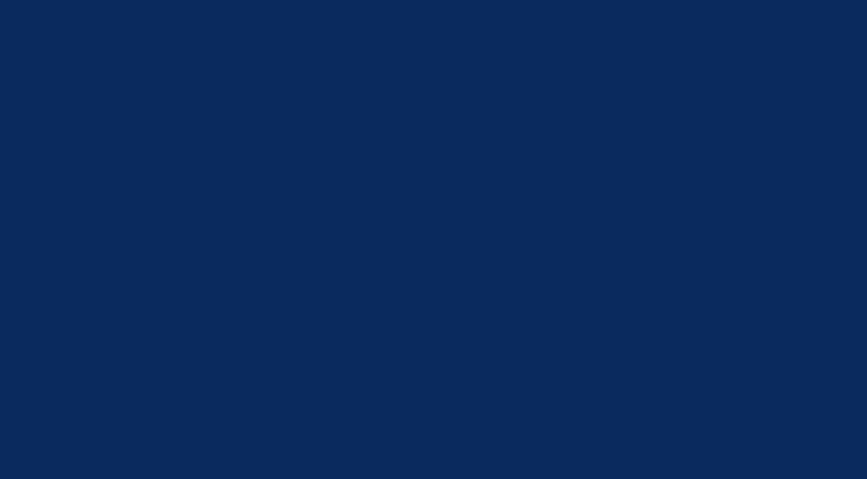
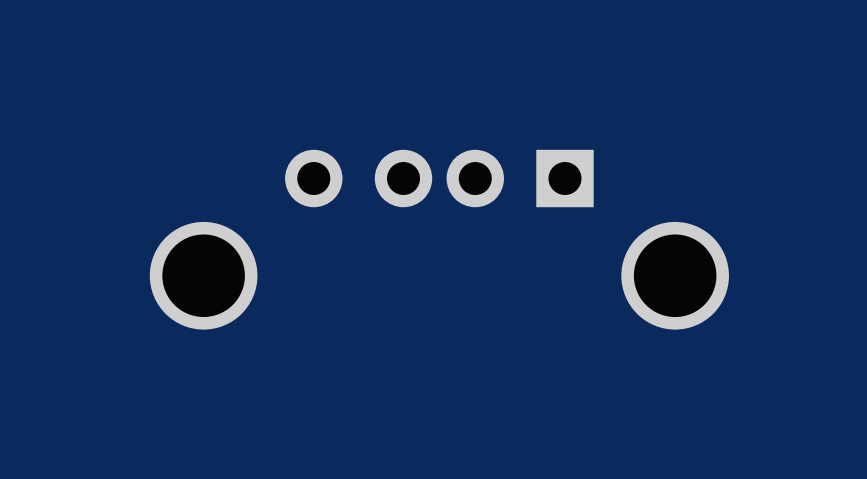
part: none -> (439, 239)

